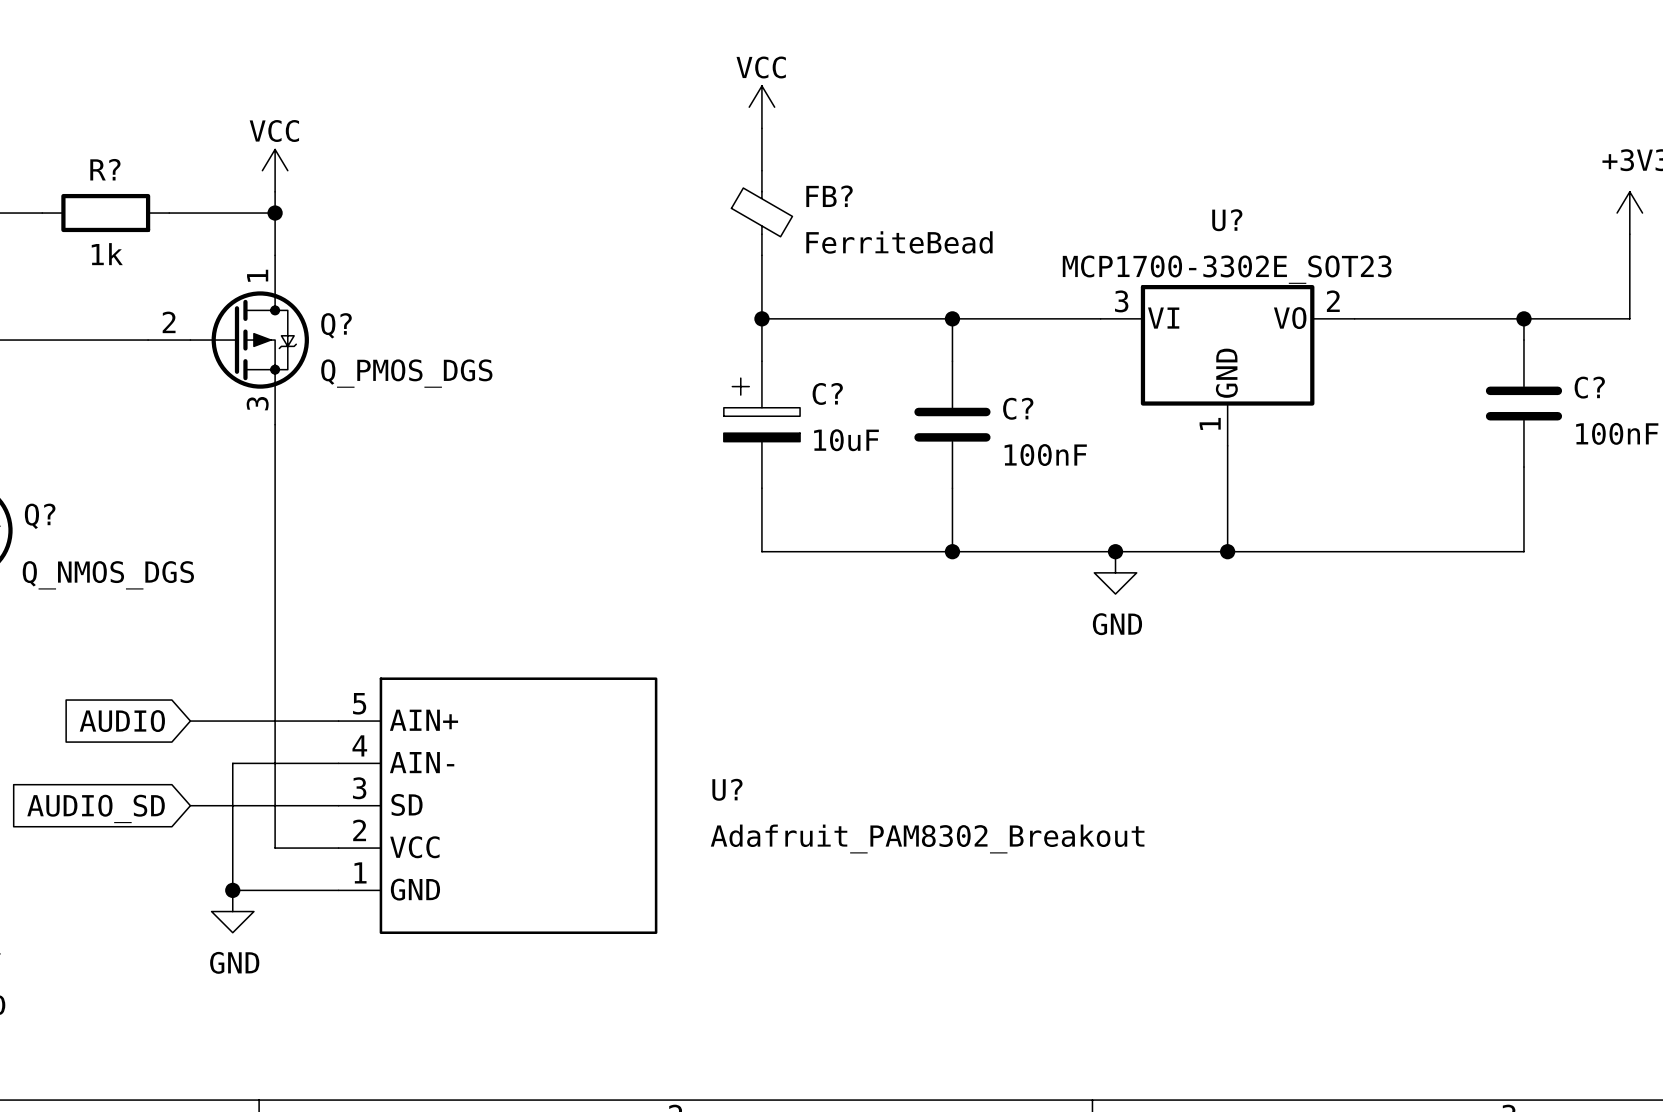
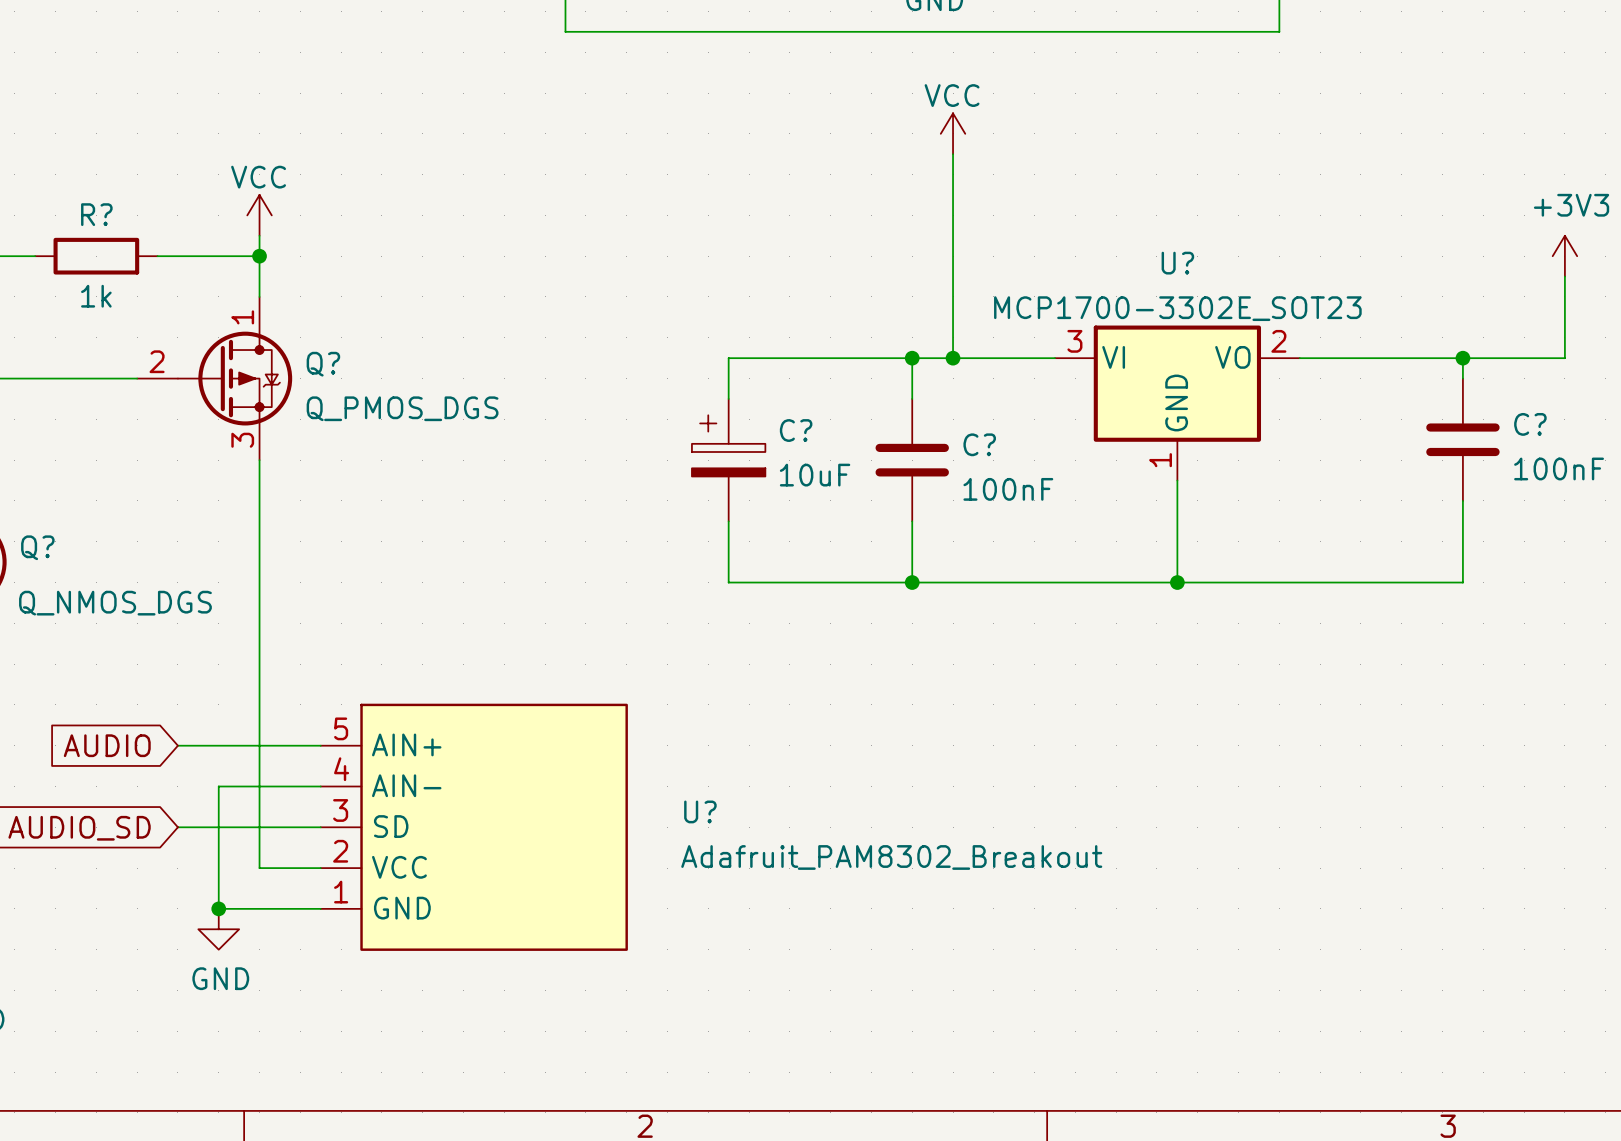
power symbol position: VCC (761, 107) -> VCC (953, 133)
wire: none -> (953, 154) (953, 358)
wire: (761, 128) (761, 170) -> none
FB?: FerriteBead (761, 213) -> none
wire: (761, 255) (761, 318) -> none
junction: (761, 318) -> none
junction: none -> (953, 358)
junction: (1115, 551) -> none
power symbol: GND (1115, 572) -> none

